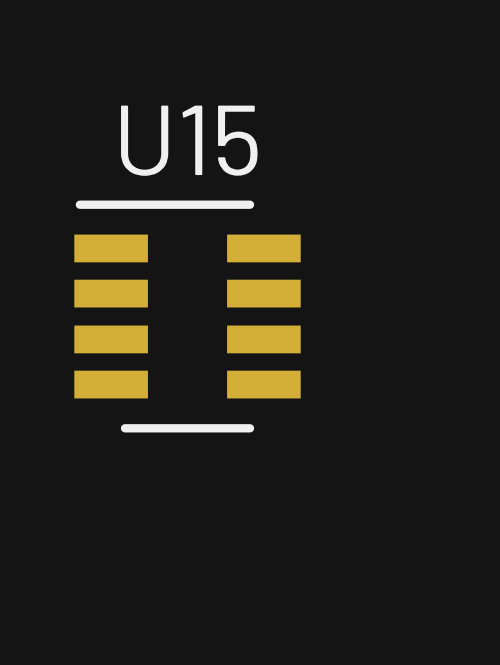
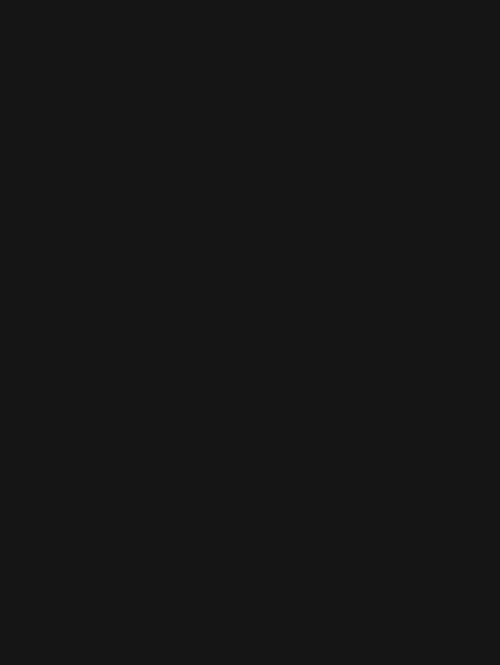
U15: (187, 316) -> none

